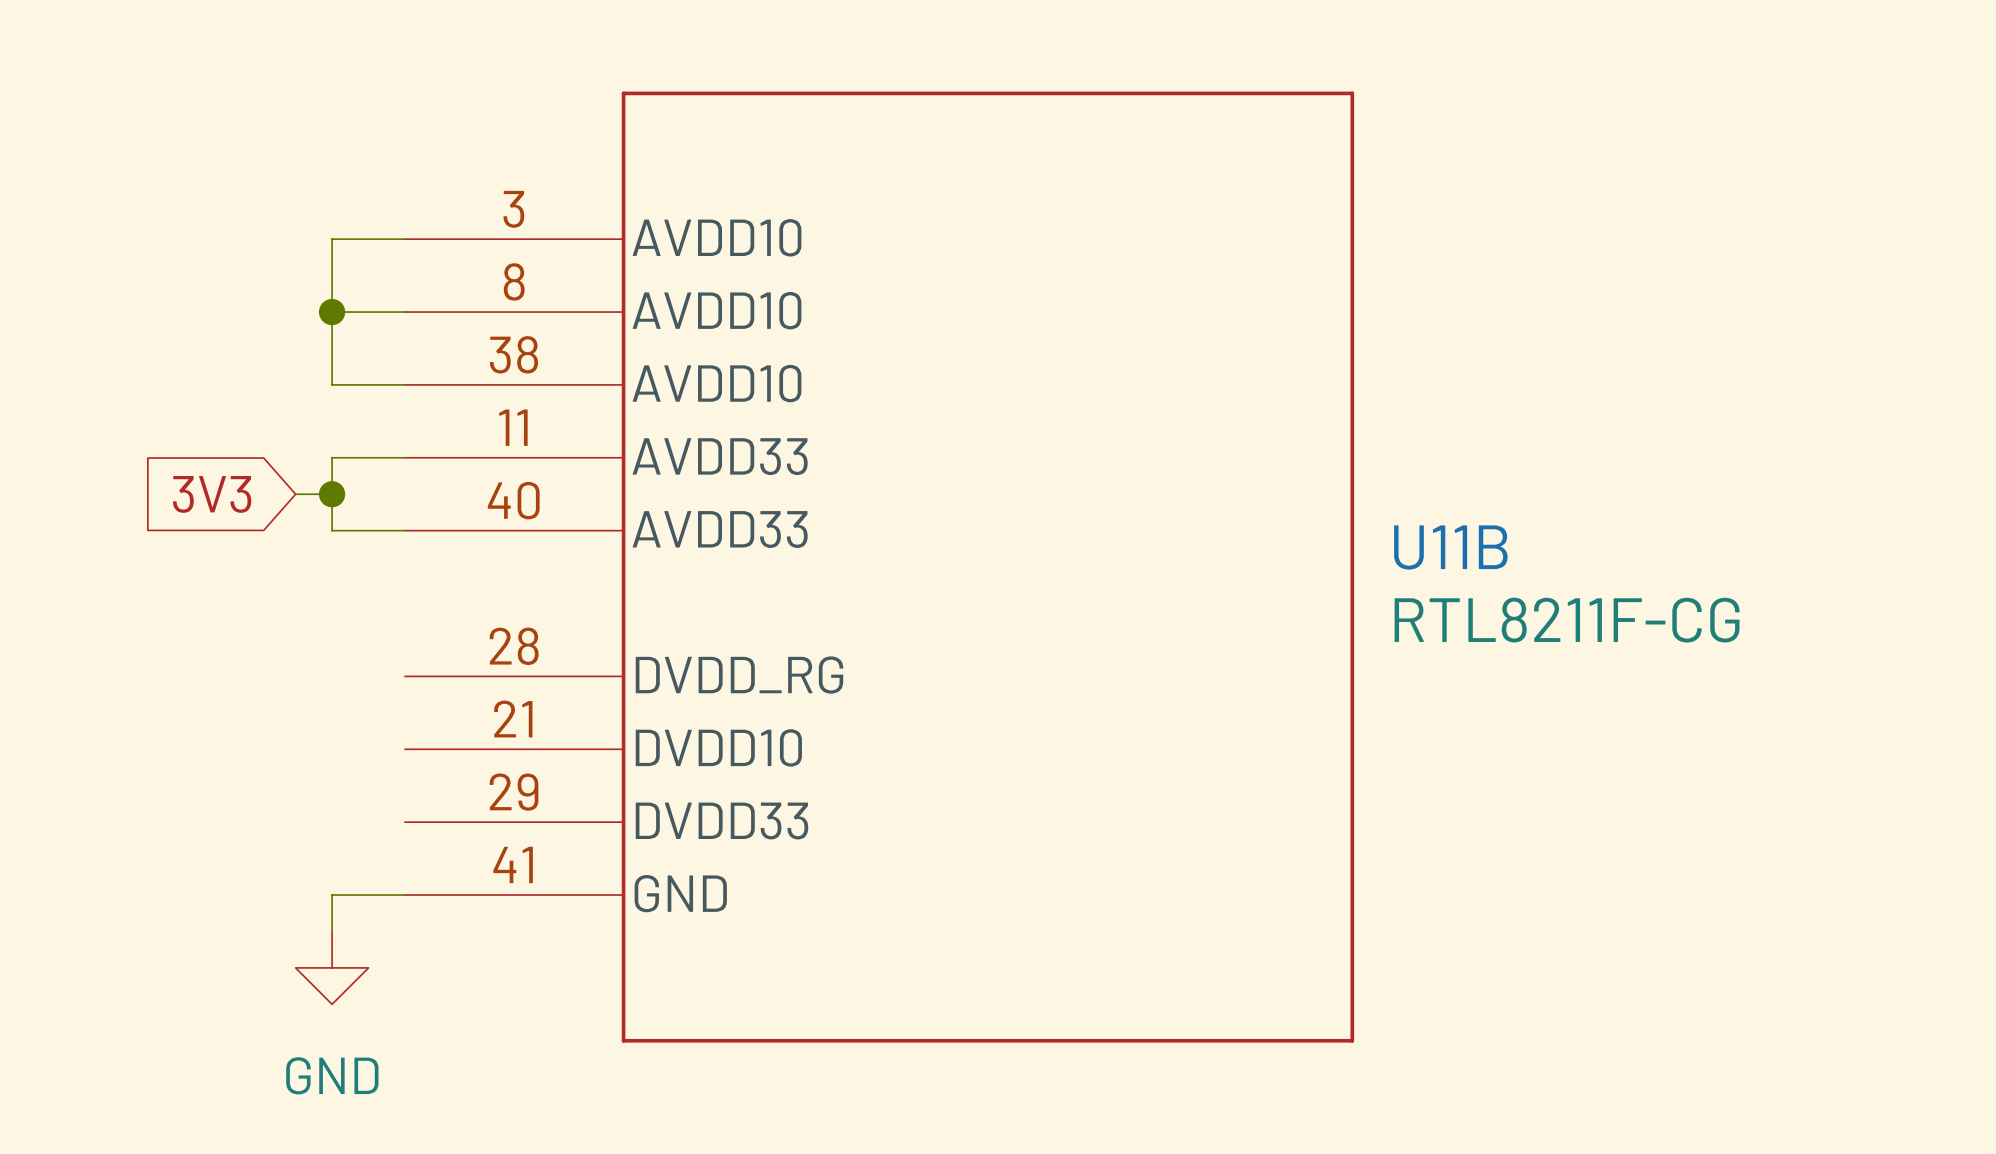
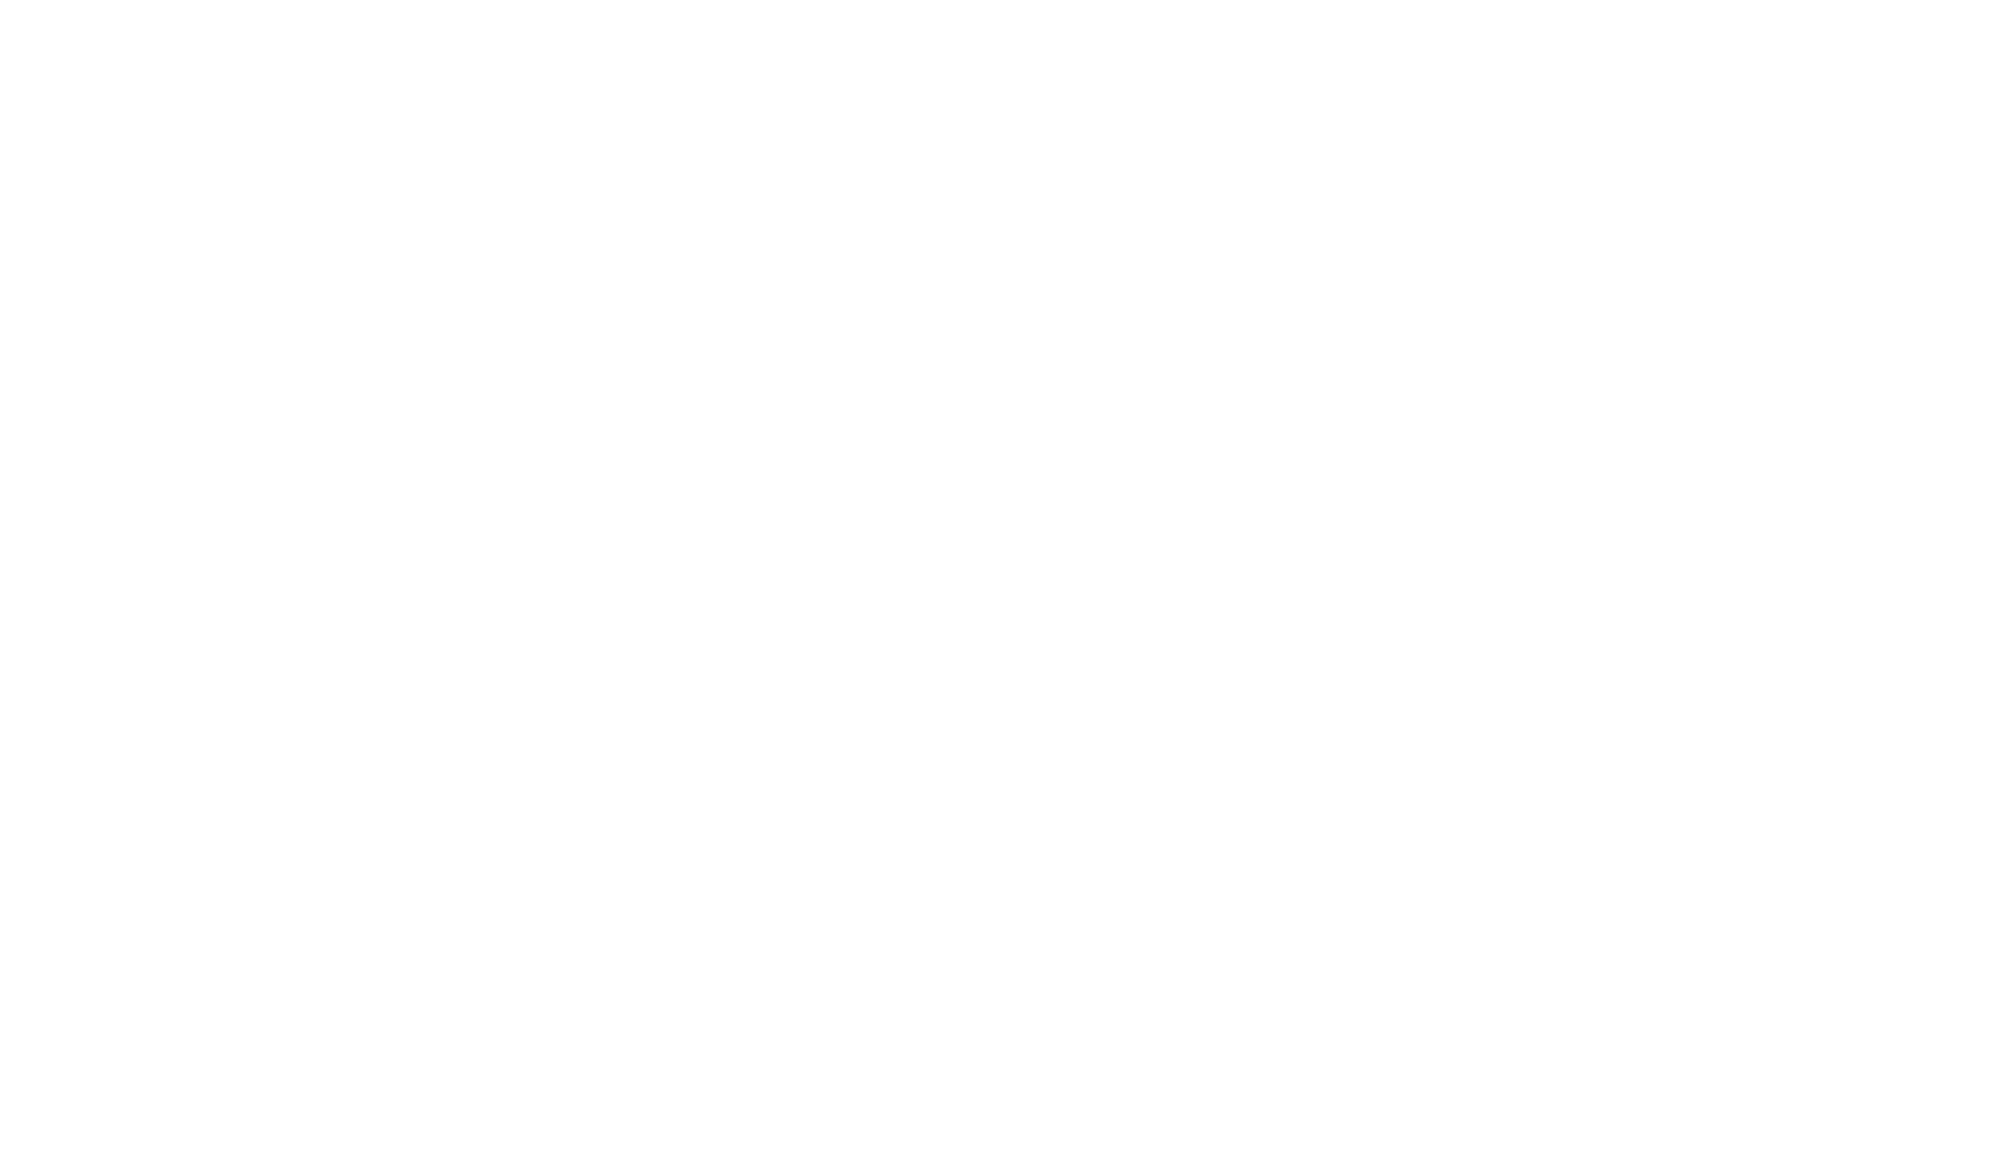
wire: (404, 239) (332, 239) (332, 384) (404, 384) -> none
wire: (332, 312) (404, 312) -> none
junction: (332, 312) -> none
wire: (404, 457) (332, 457) (332, 530) (404, 530) -> none
global label: 3V3 (212, 494) -> none
wire: (295, 494) (332, 494) -> none
junction: (332, 494) -> none
U11B: RTL8211F-CG (879, 567) -> none
wire: (404, 895) (332, 895) (332, 931) -> none
power symbol: GND (332, 967) -> none

